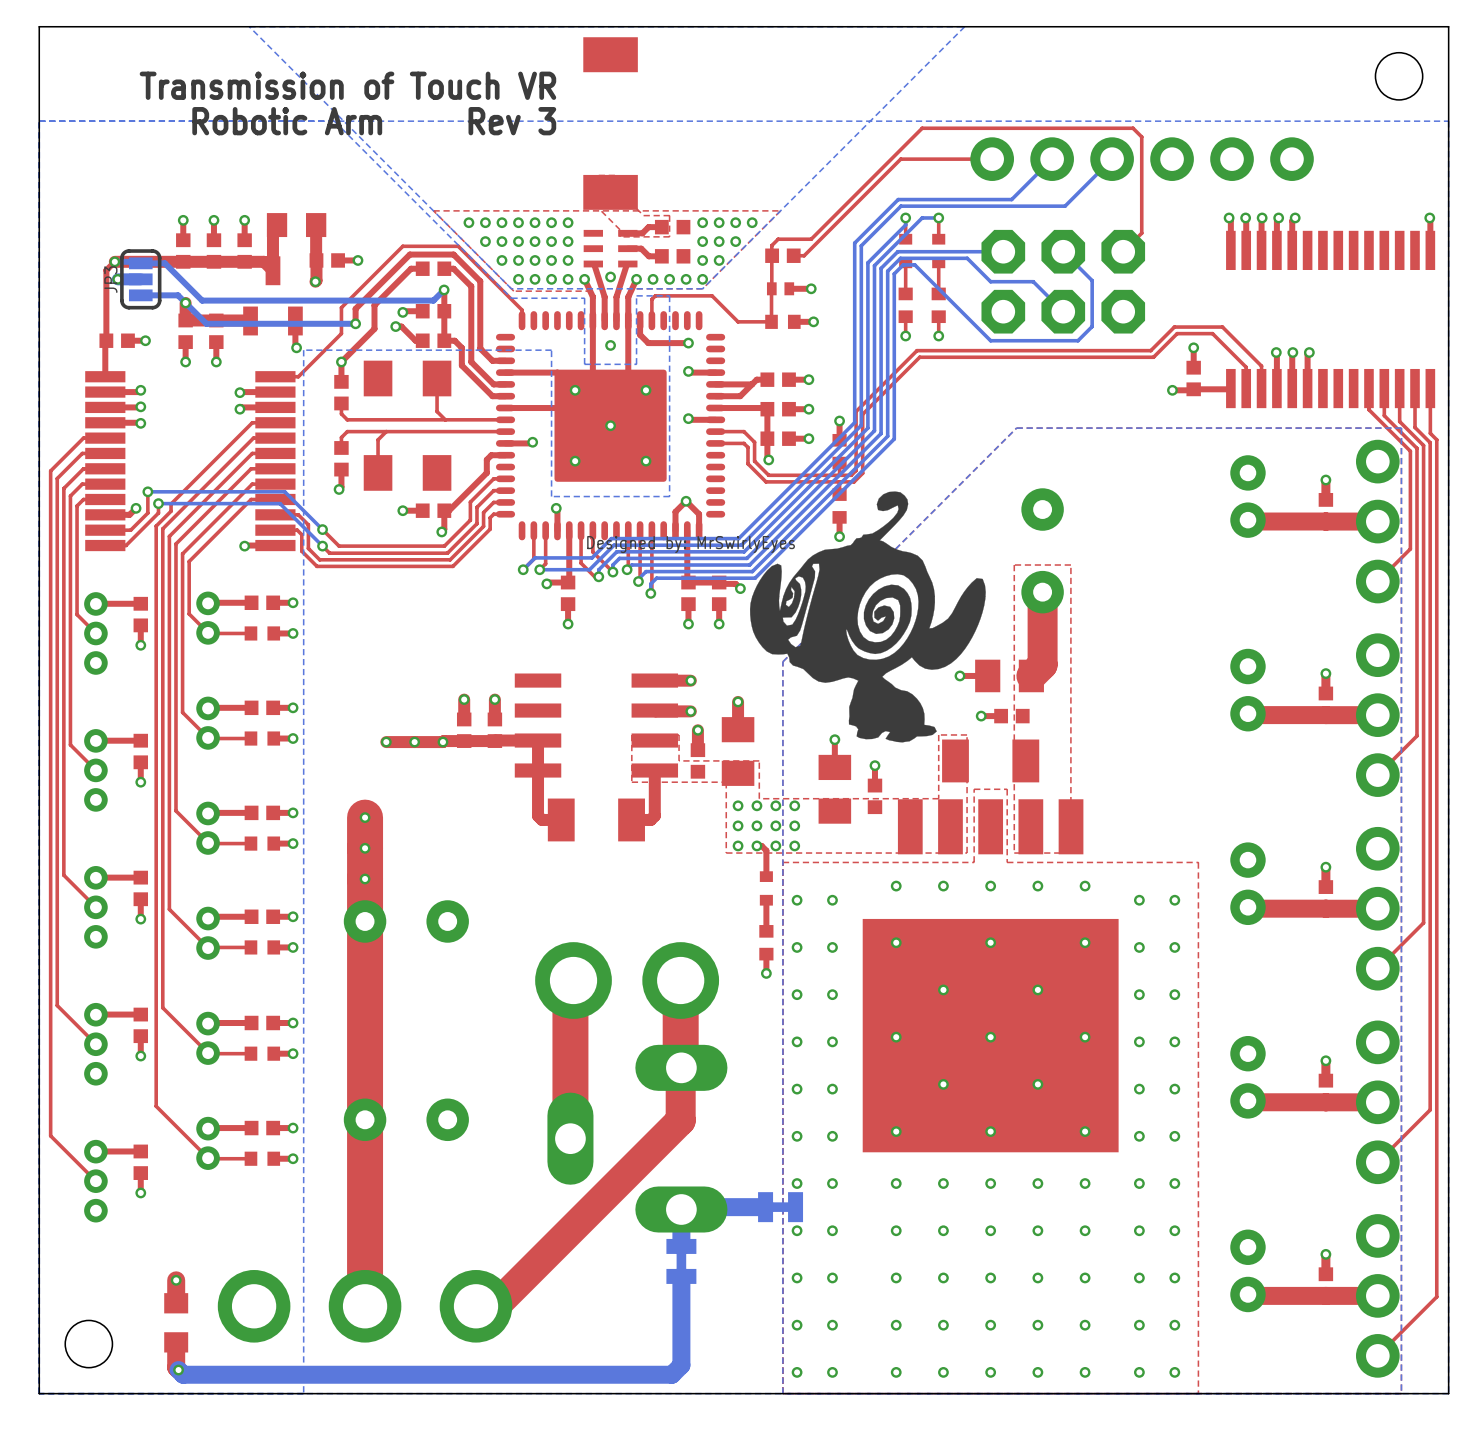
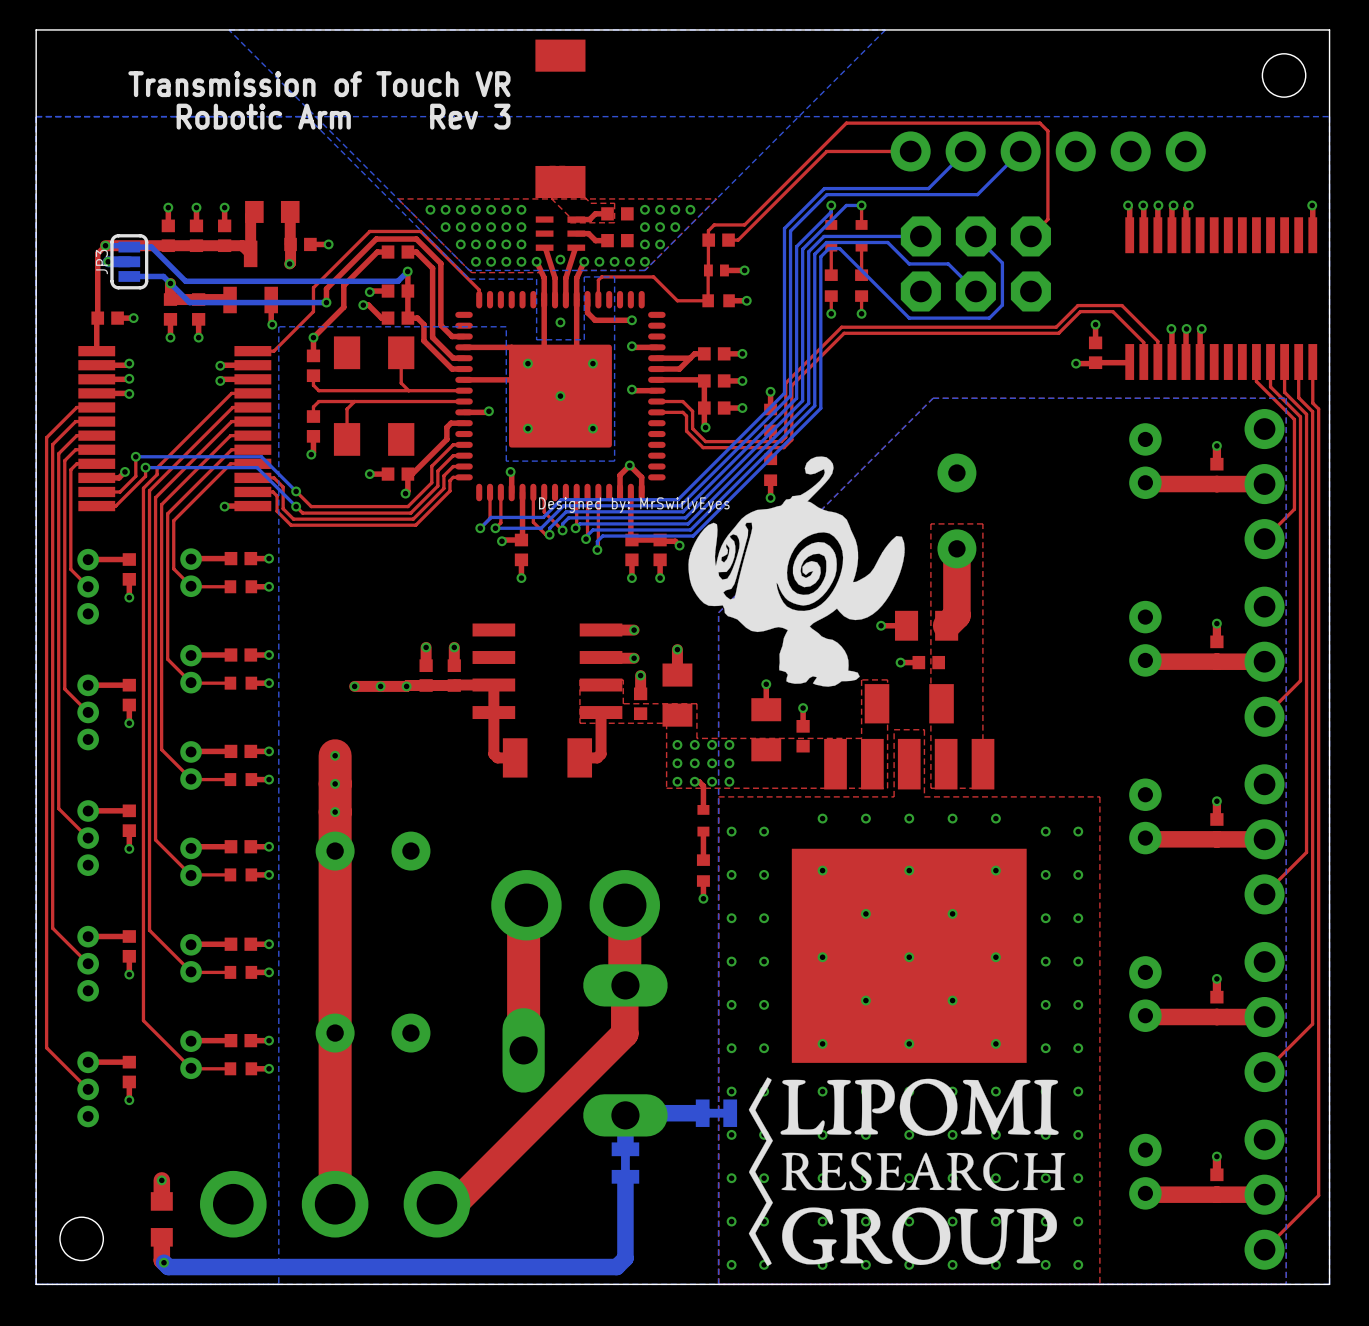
drawing: none -> [748, 1077, 1066, 1267]

